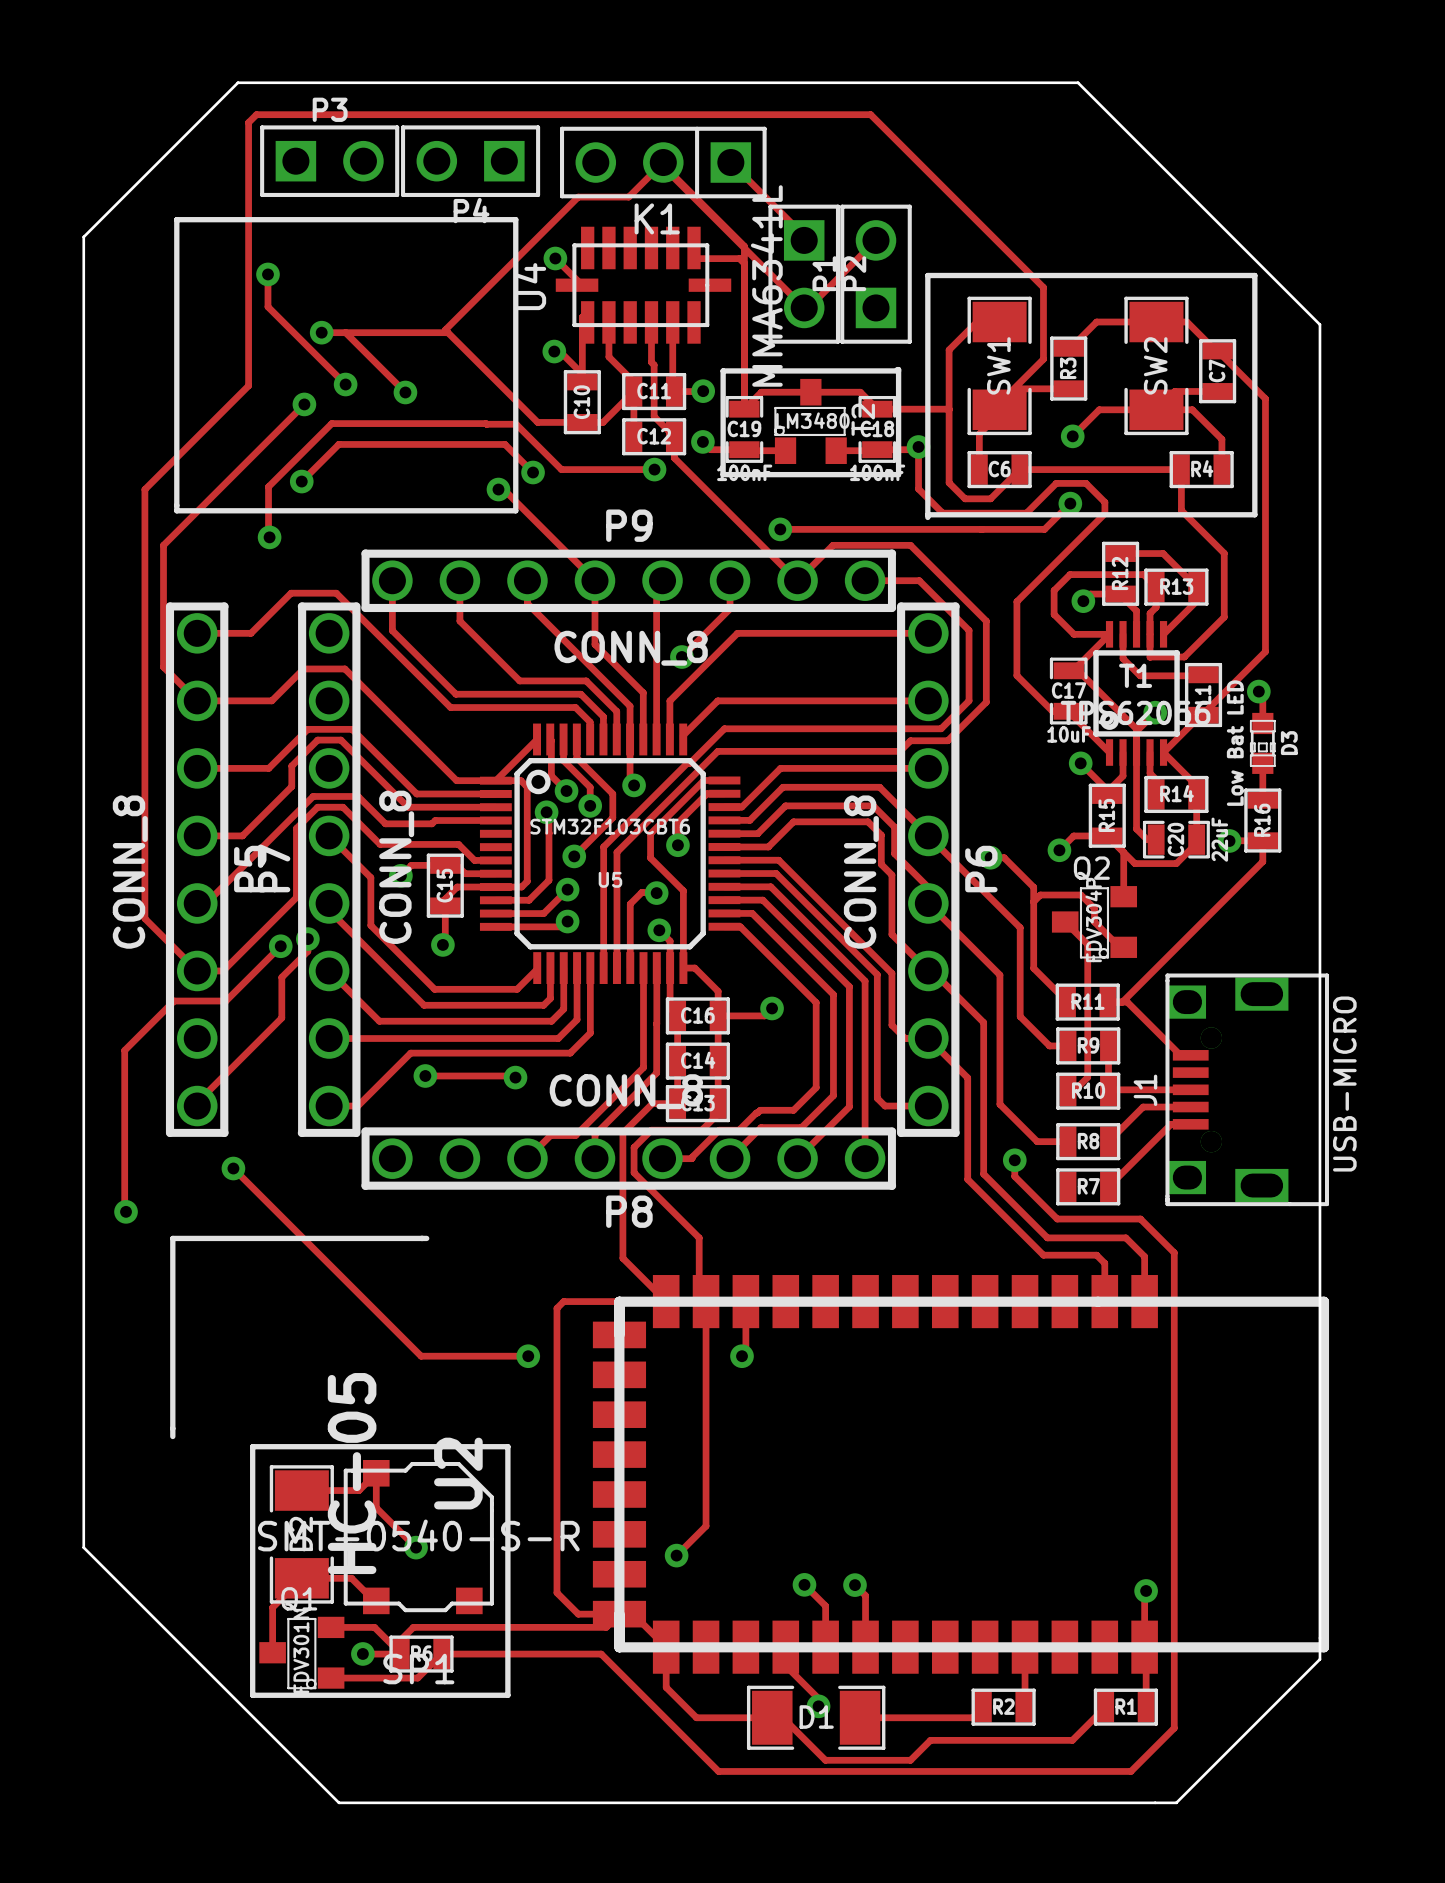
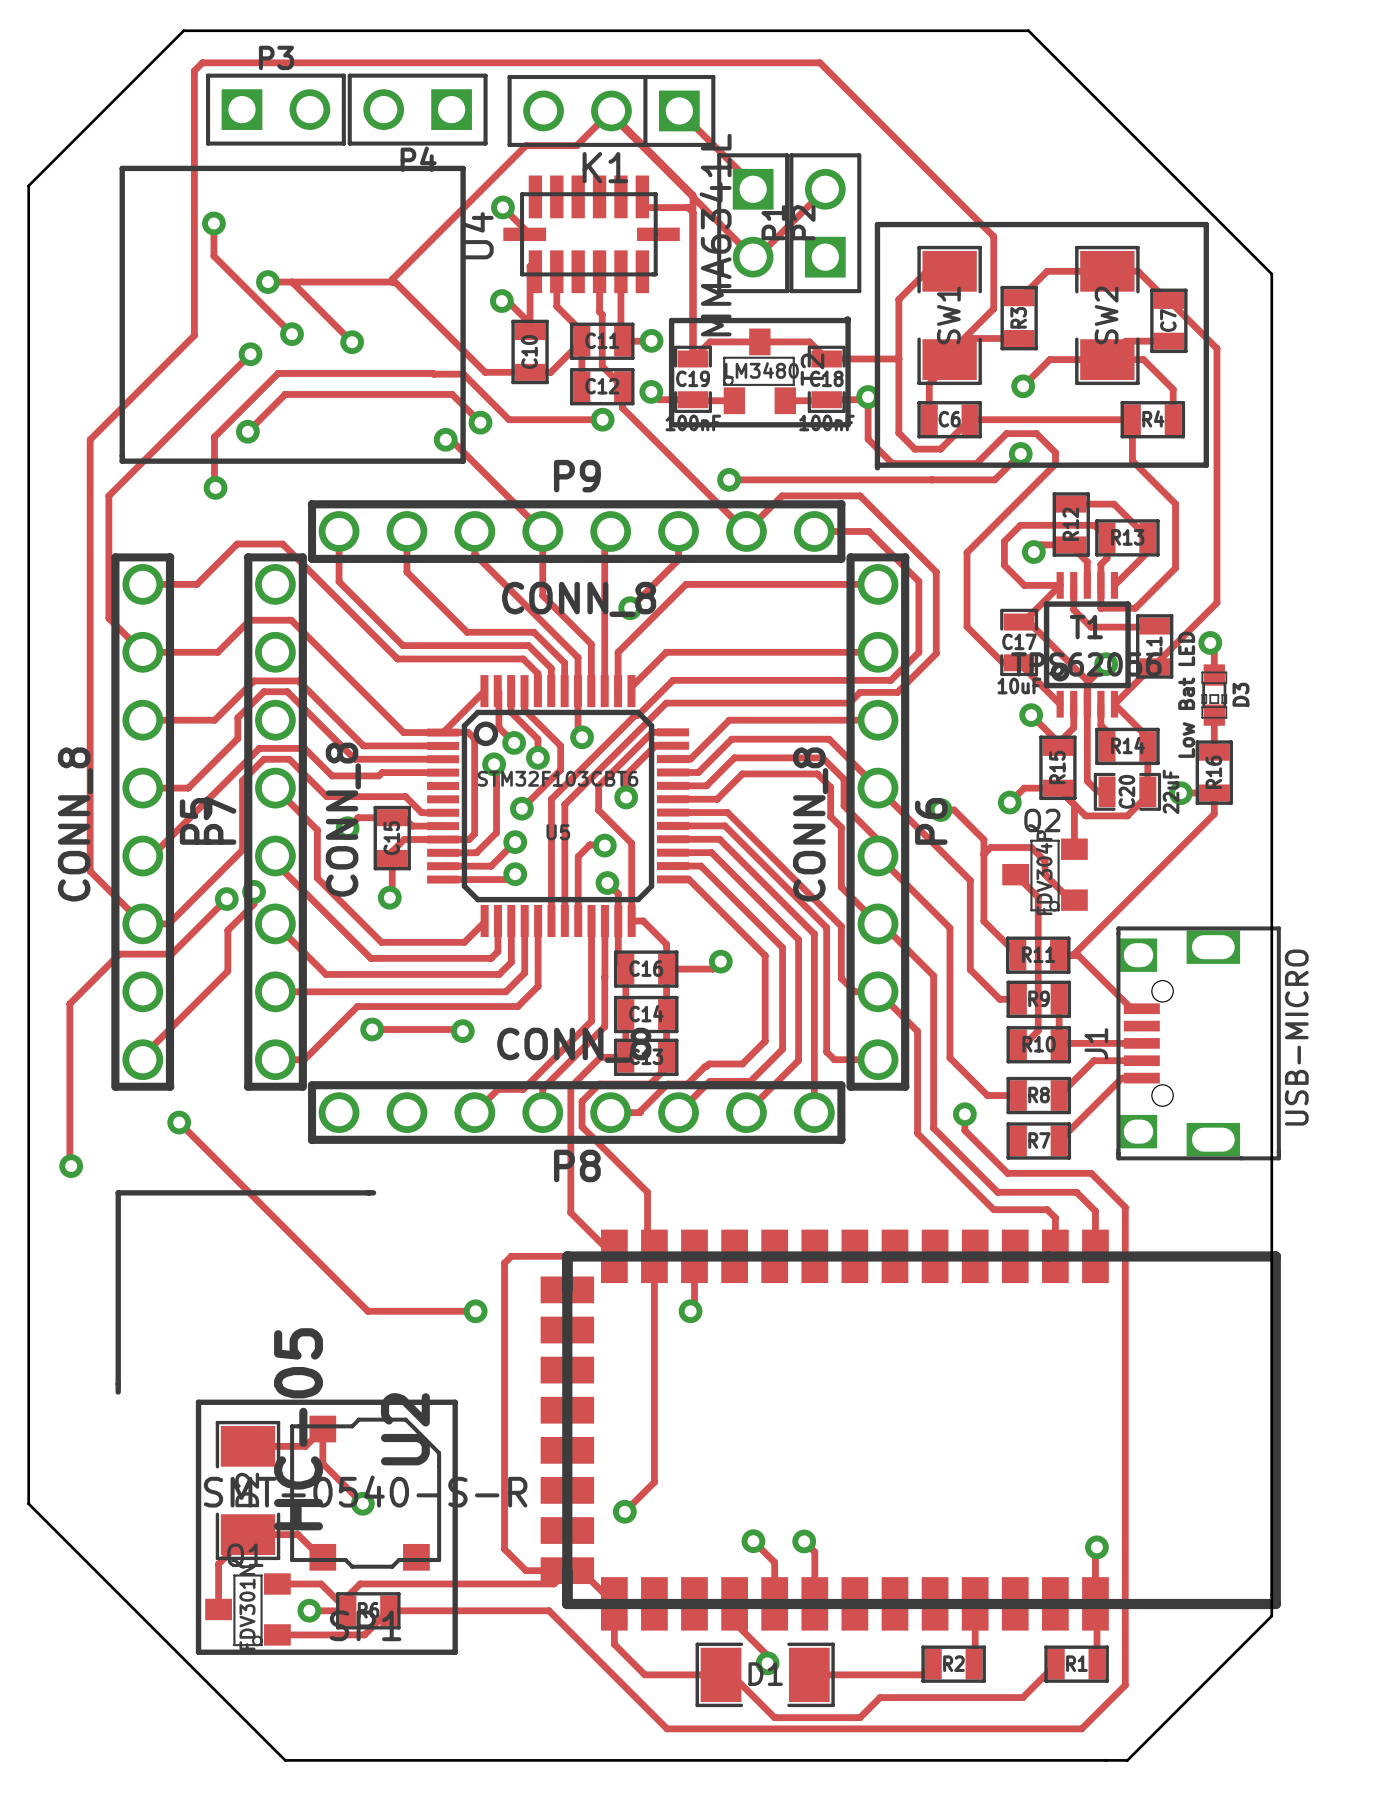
J1 footprint: [1165, 973, 1329, 1207] -> [1116, 926, 1281, 1161]

